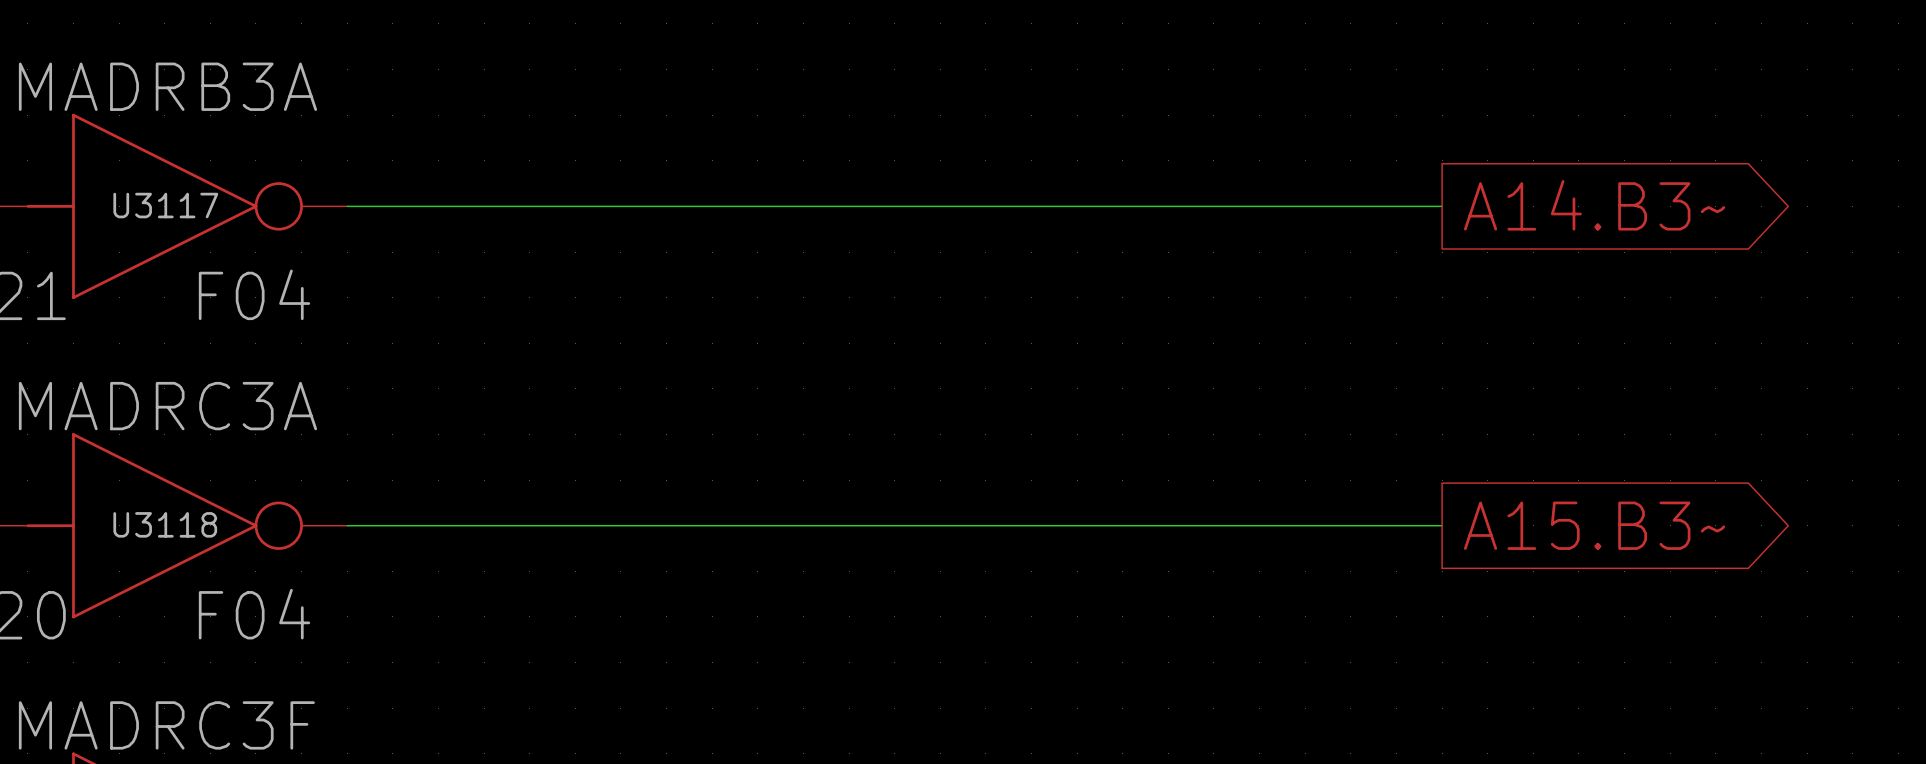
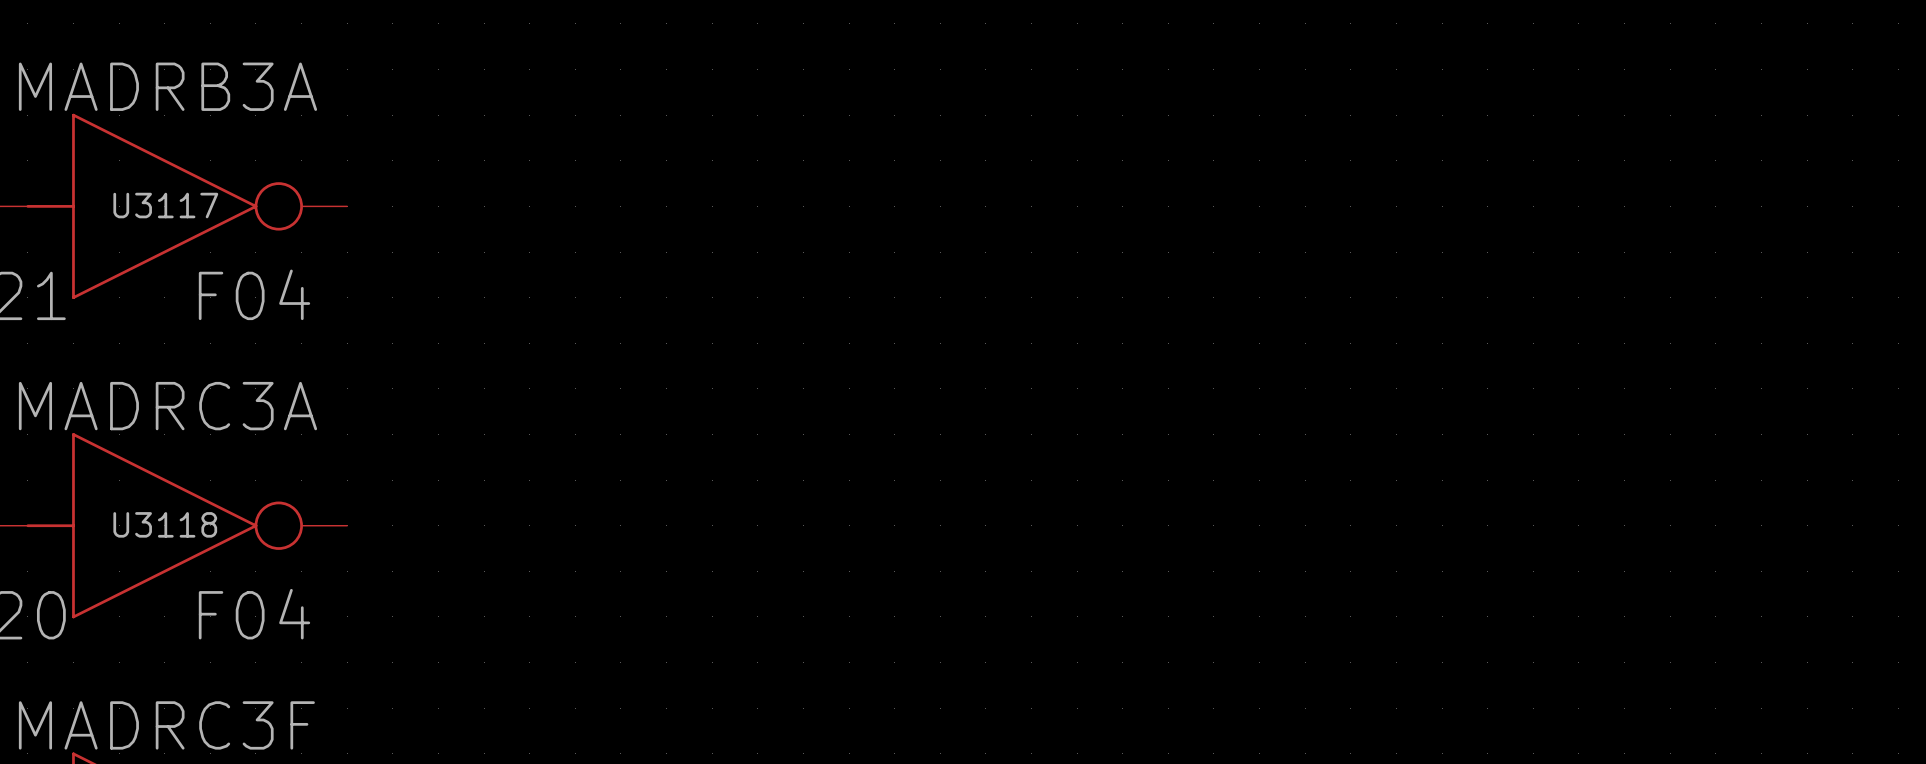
global label: A14.B3~ (1594, 205) -> none
wire: (347, 206) (1442, 206) -> none
wire: (347, 525) (1442, 525) -> none
global label: A15.B3~ (1594, 525) -> none

